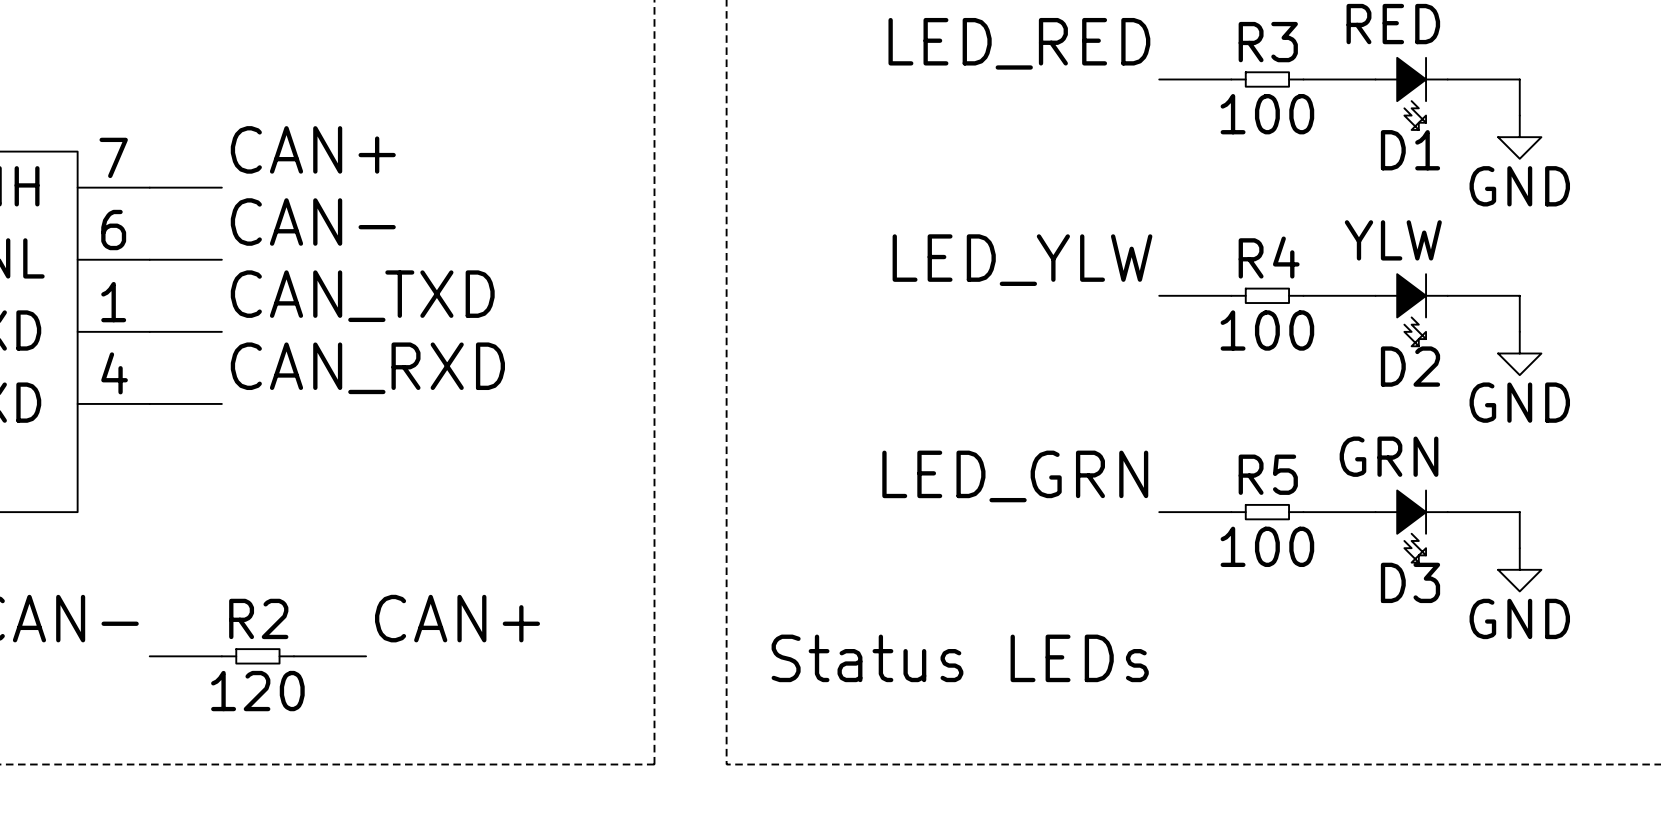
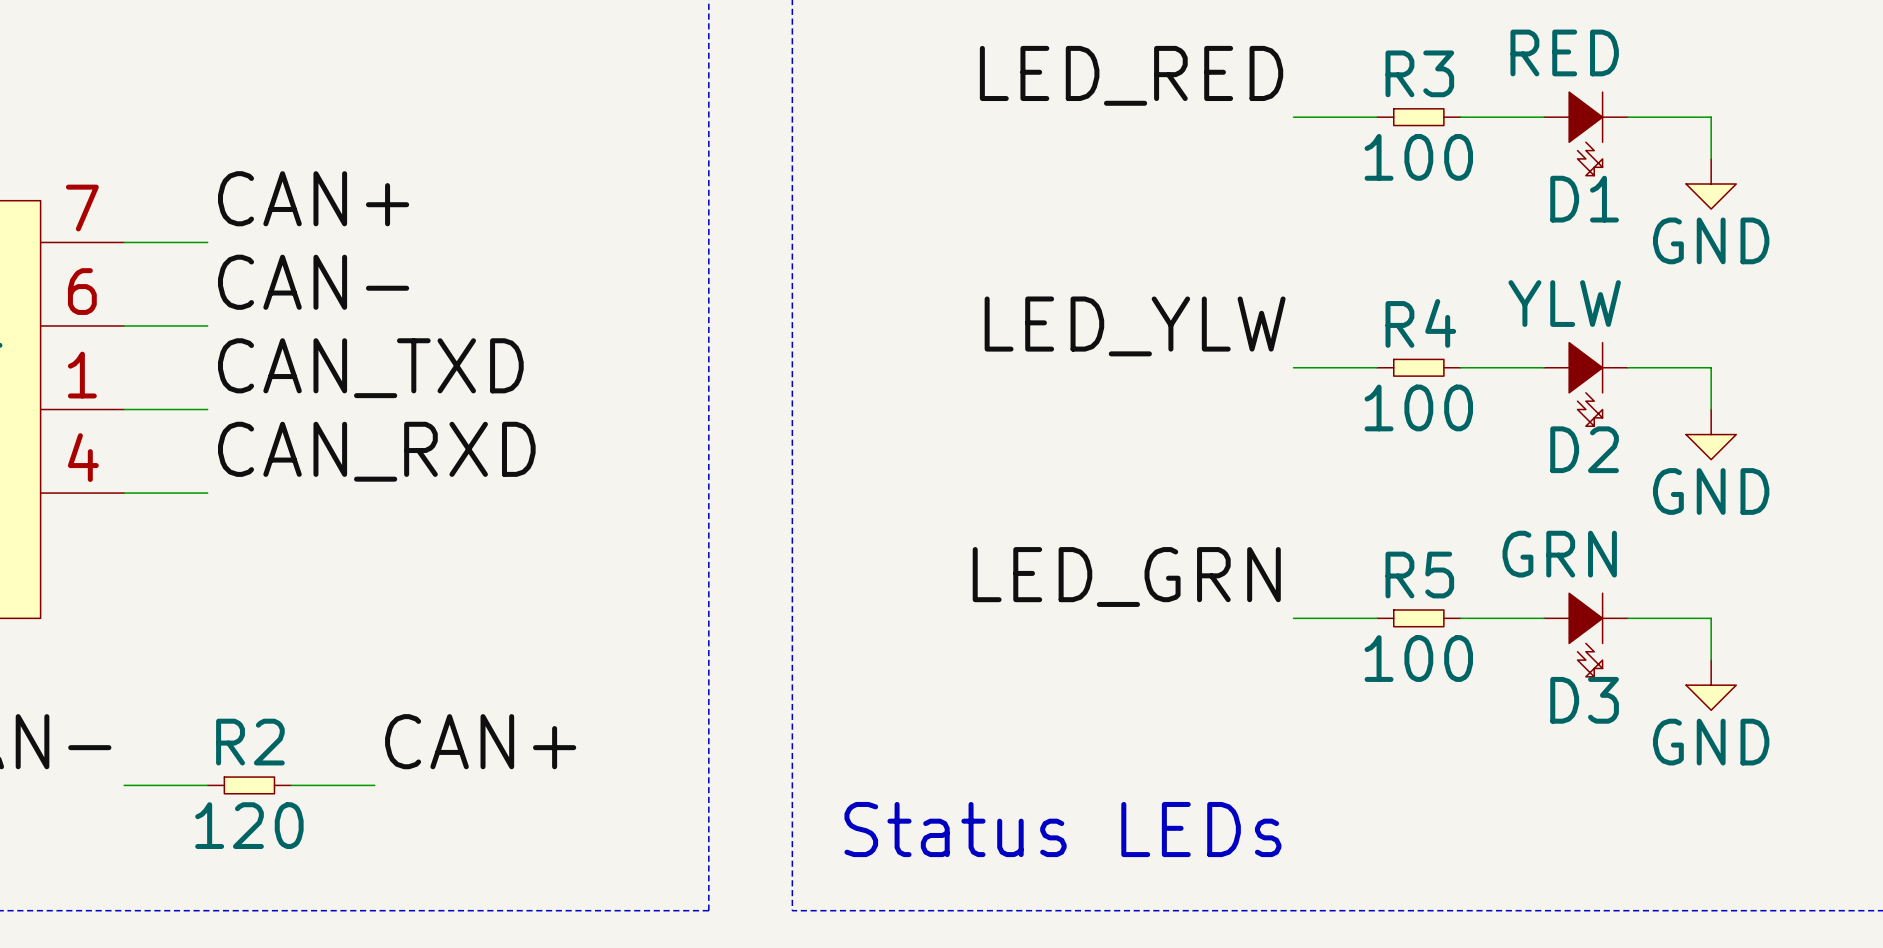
text position: Status LEDs (960, 658) -> Status LEDs (1062, 829)

